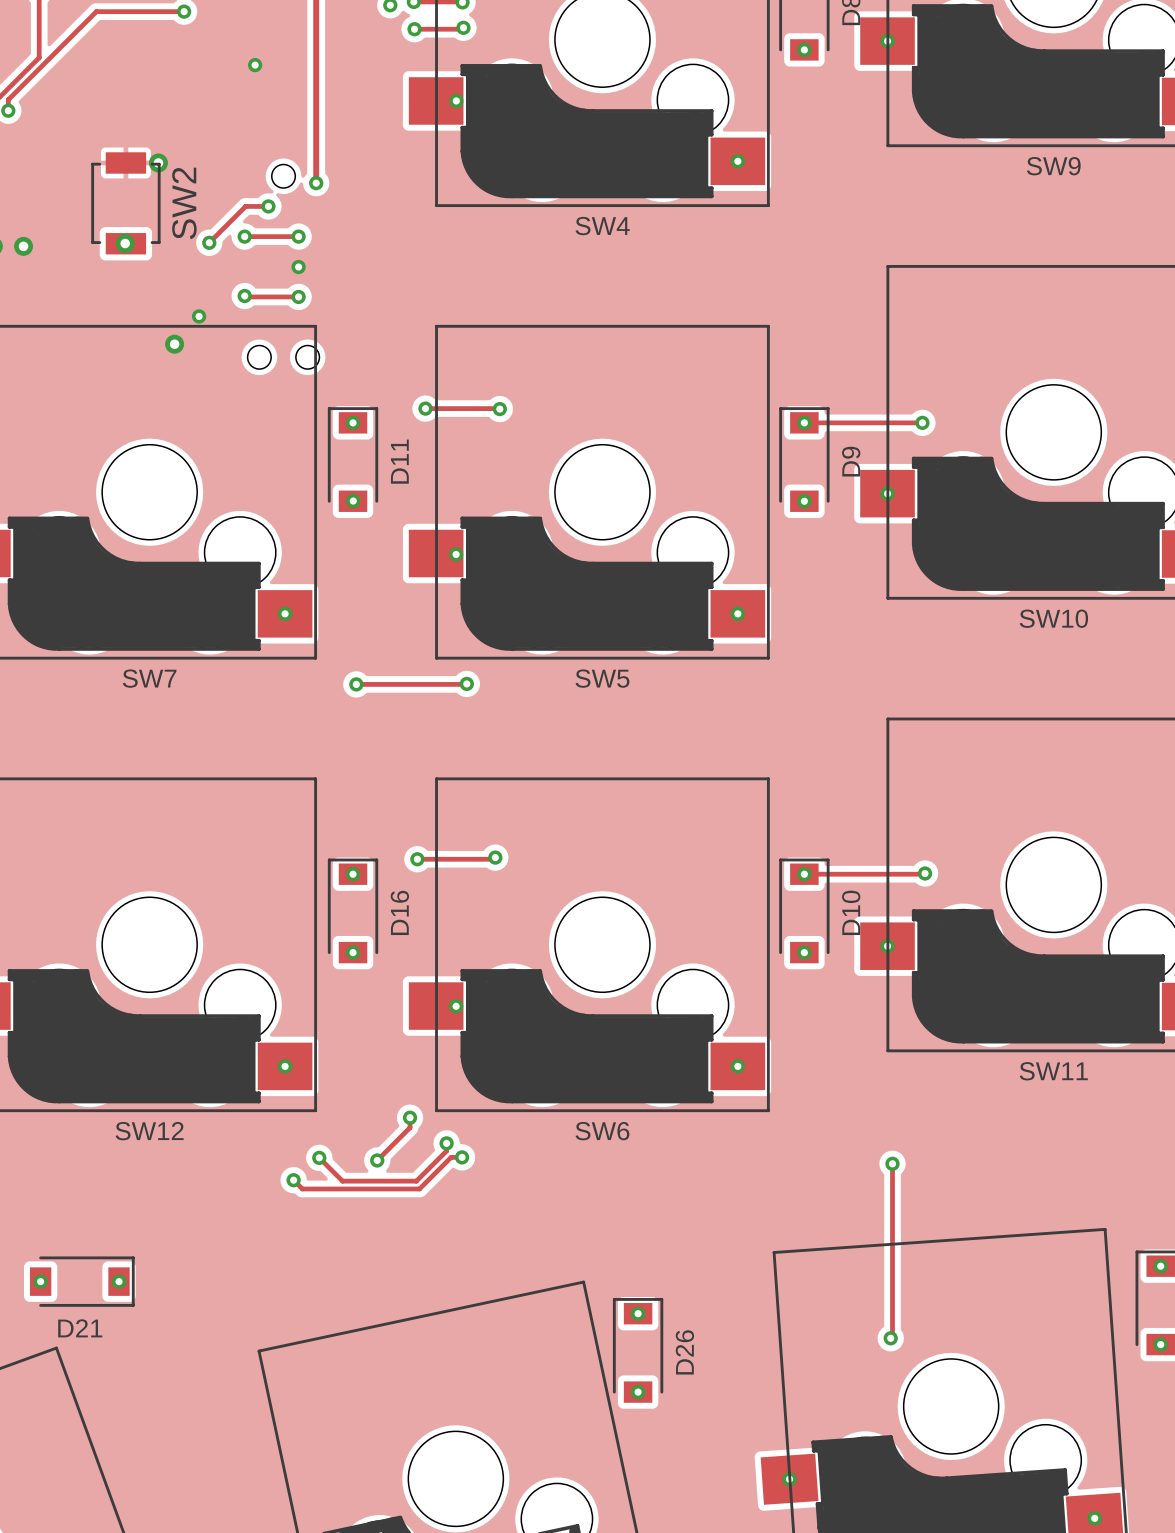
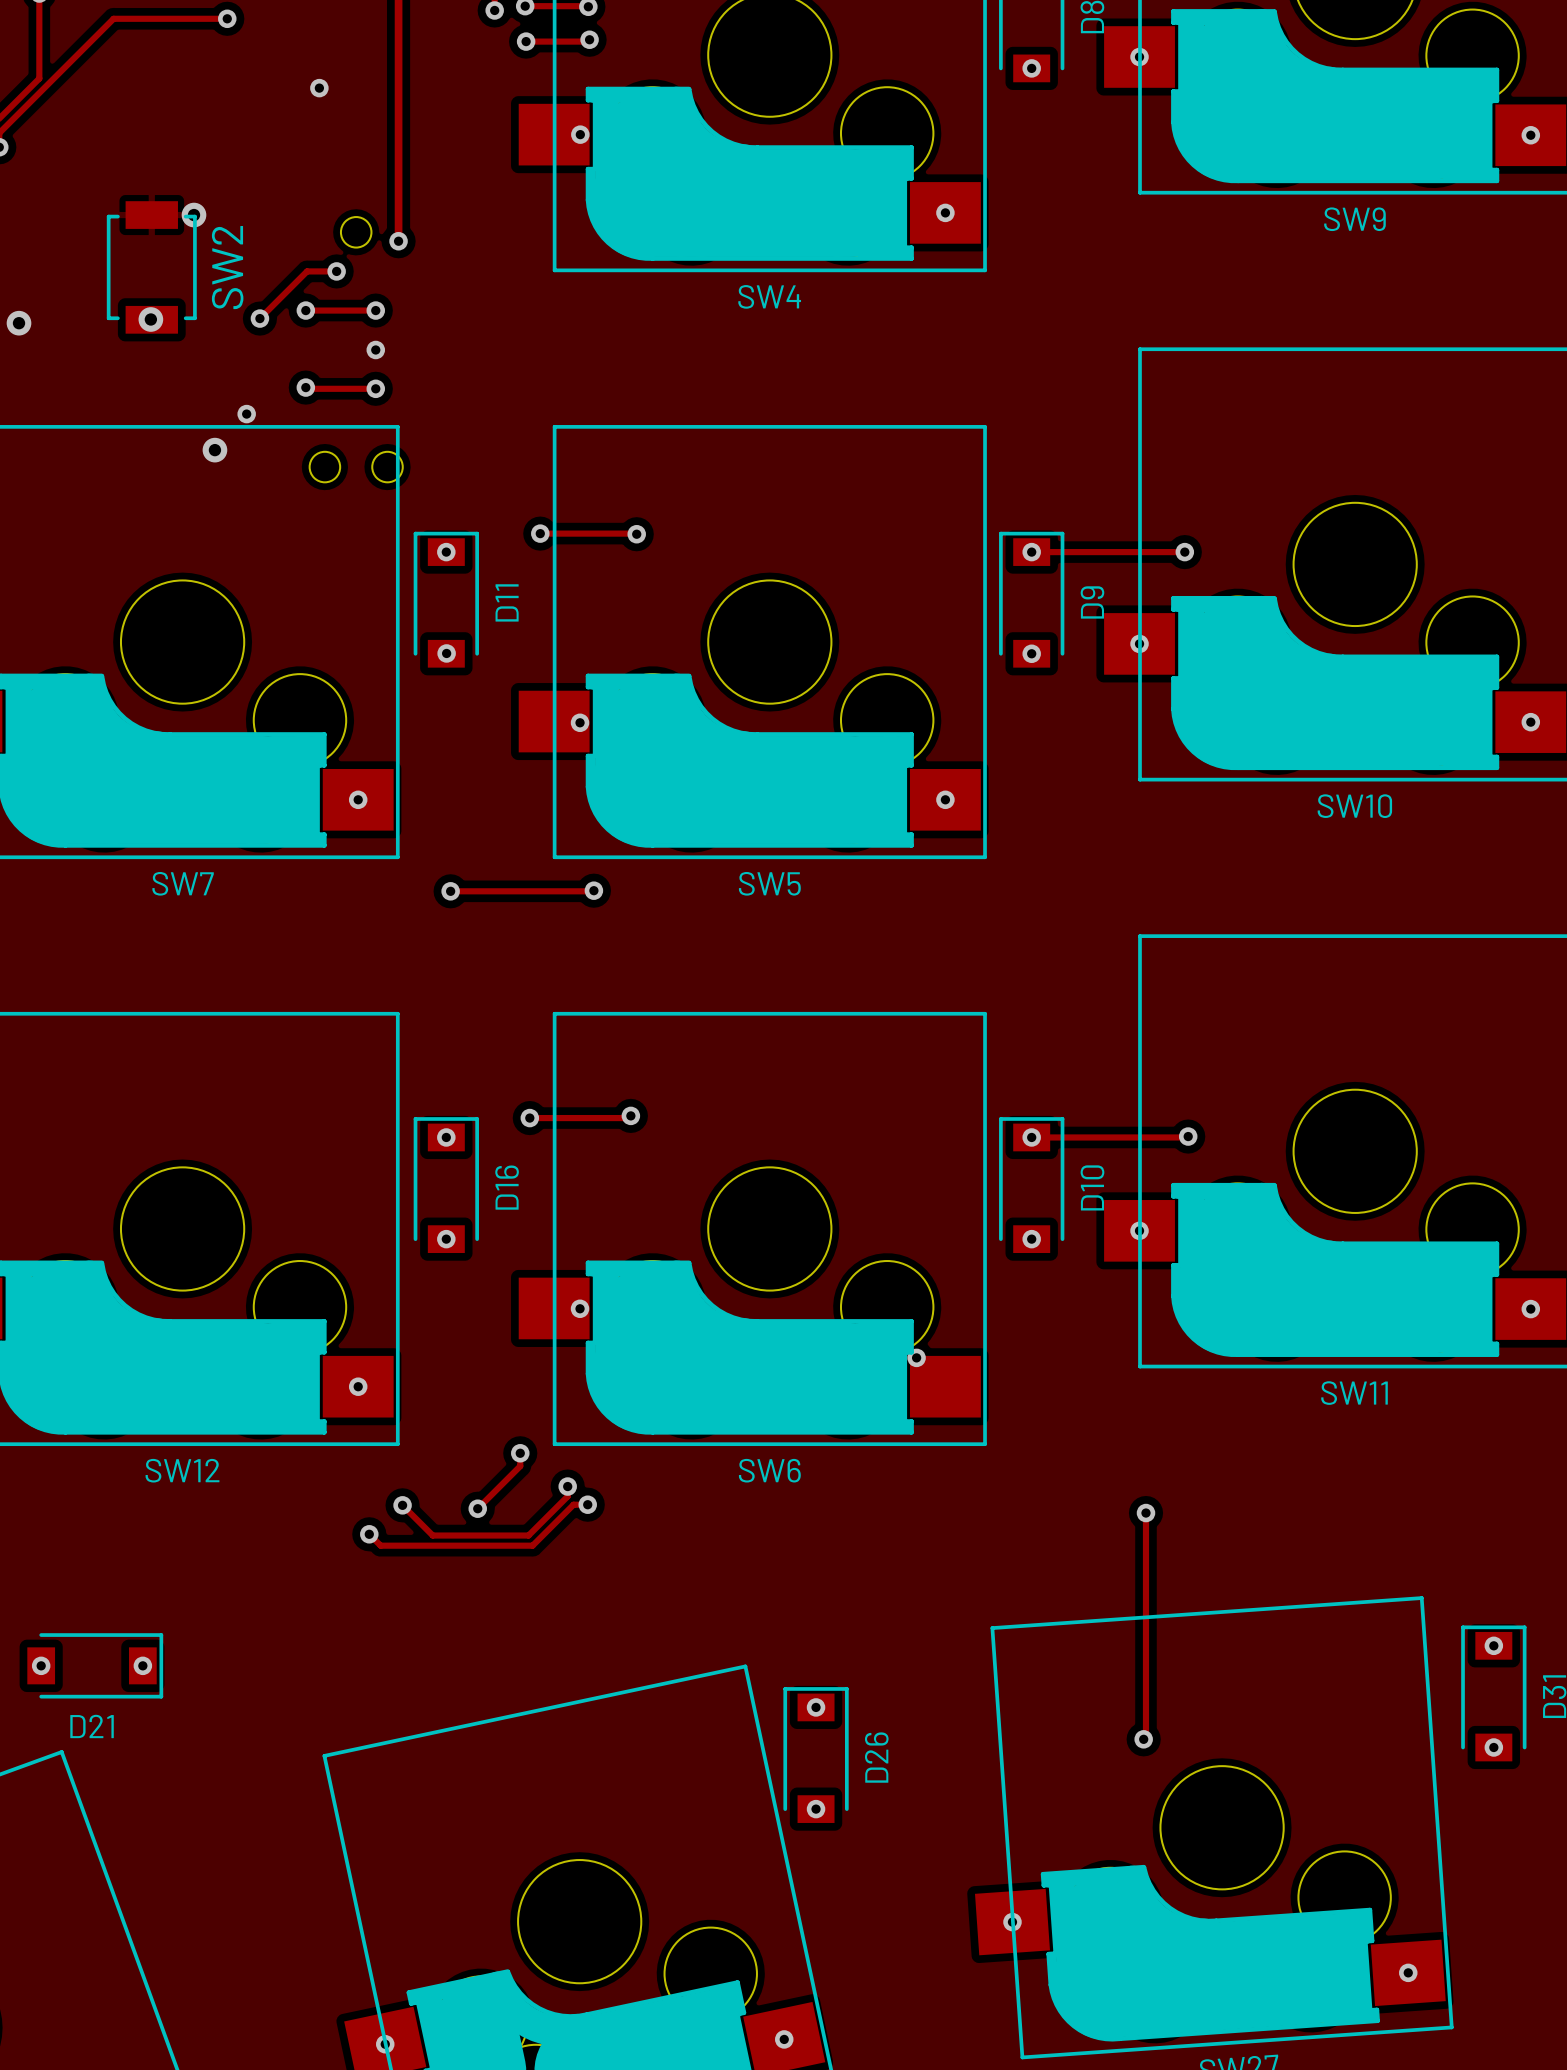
via position: (737, 1066) -> (916, 1357)

